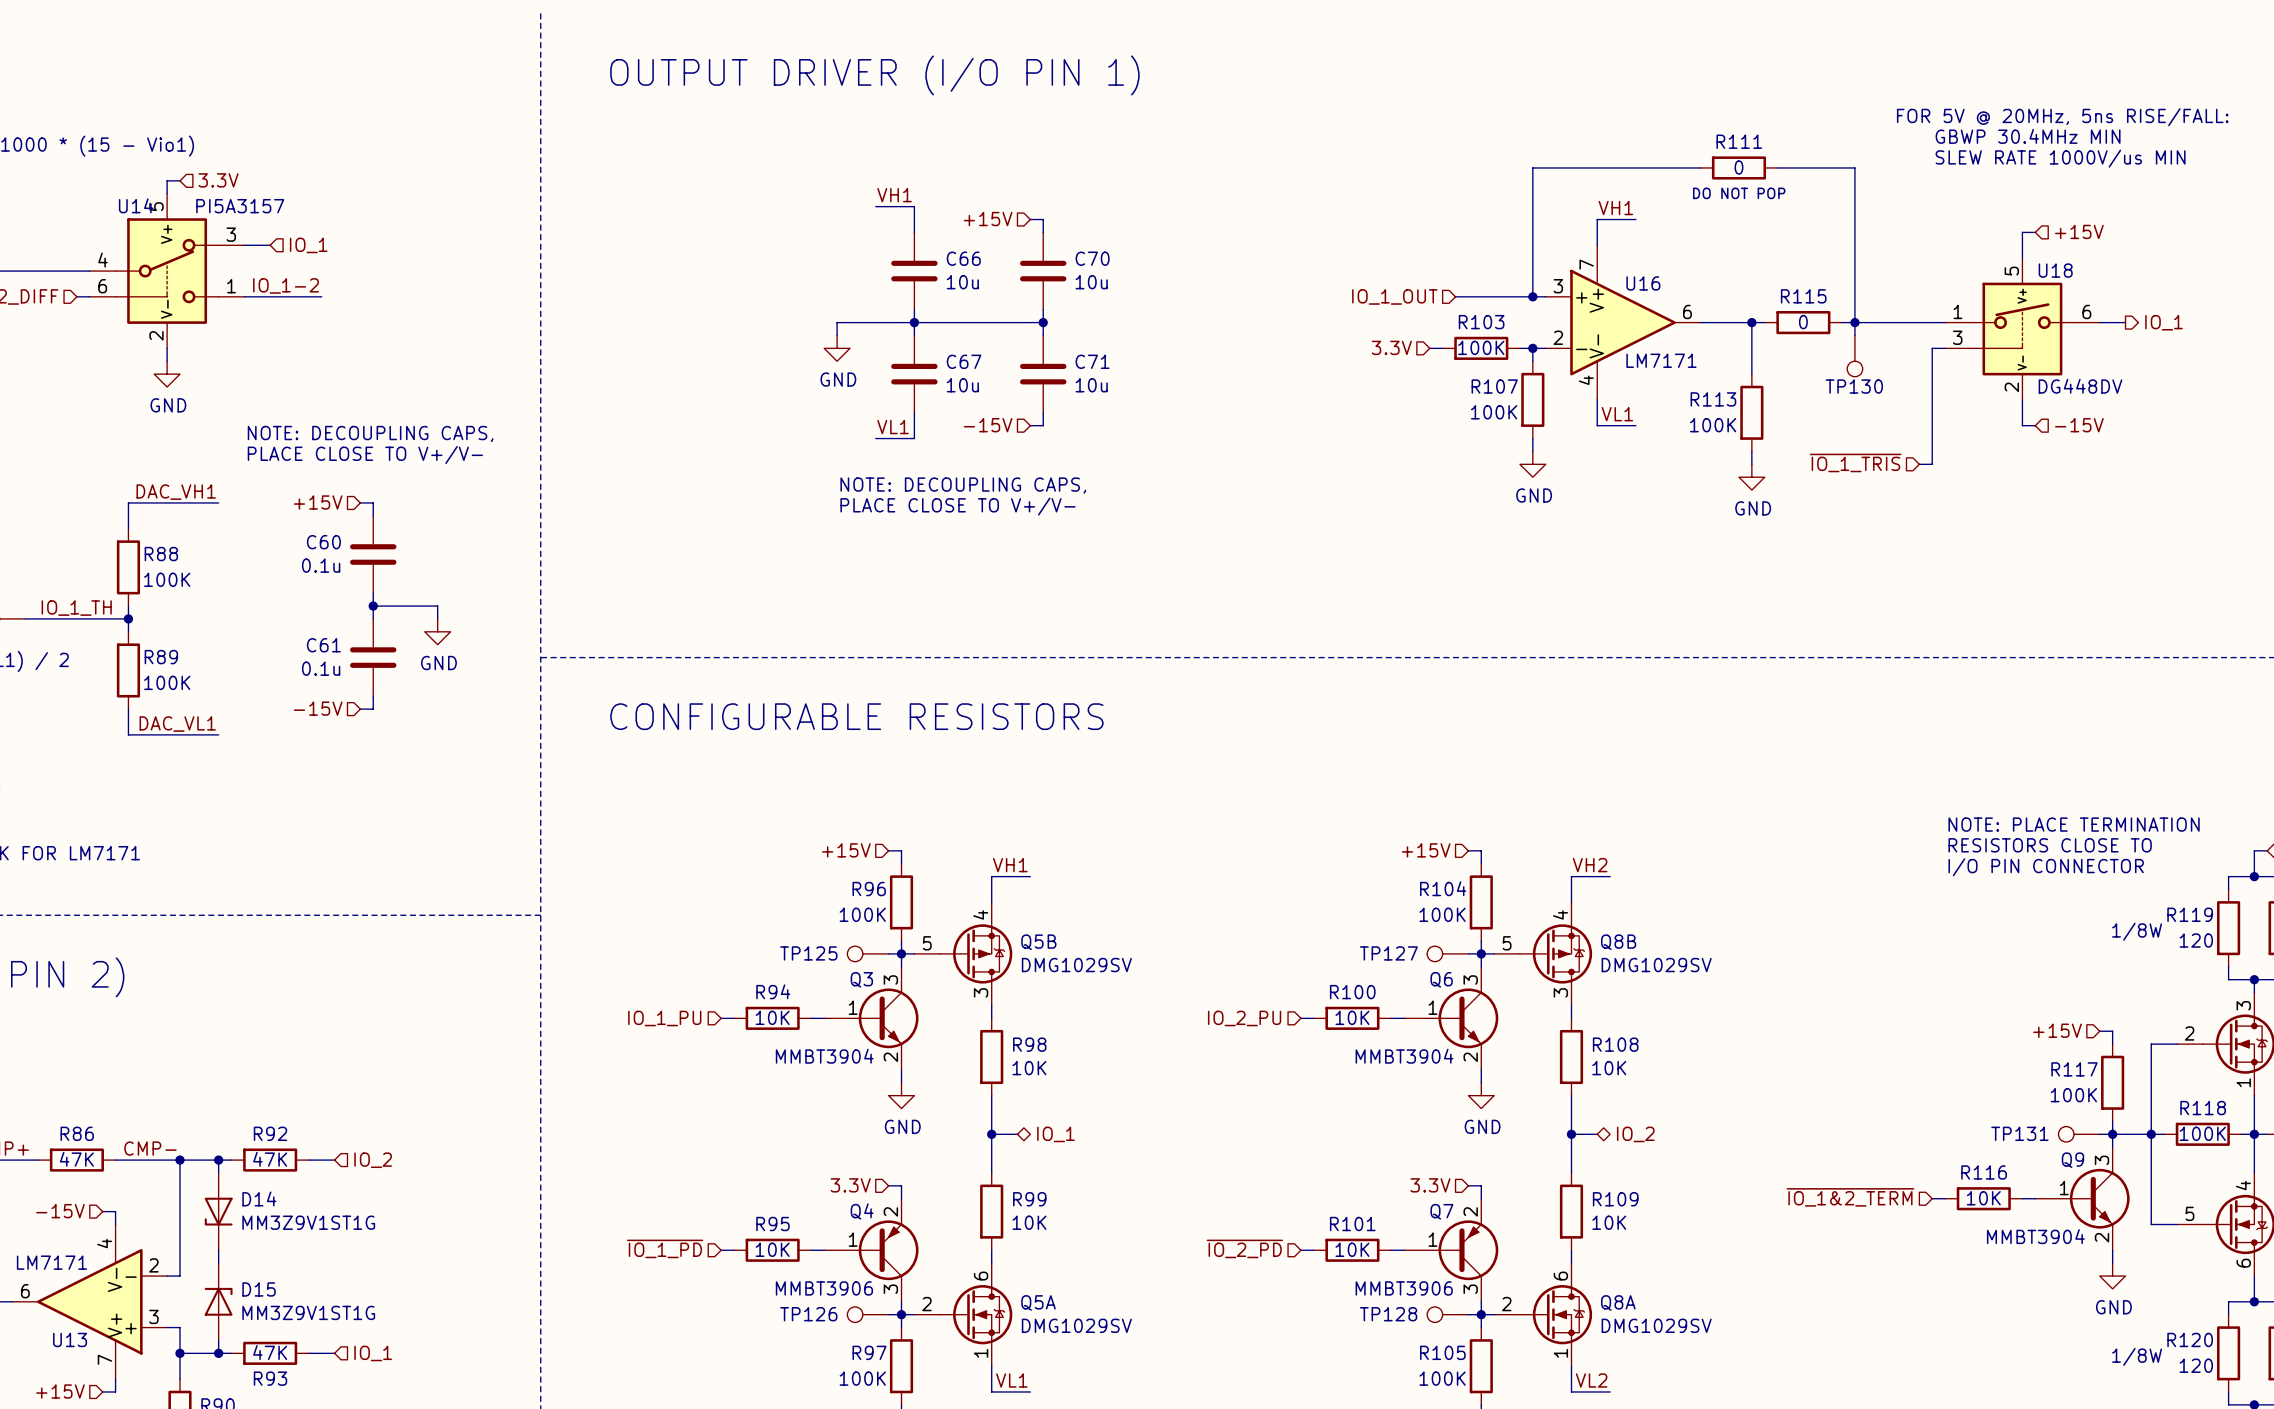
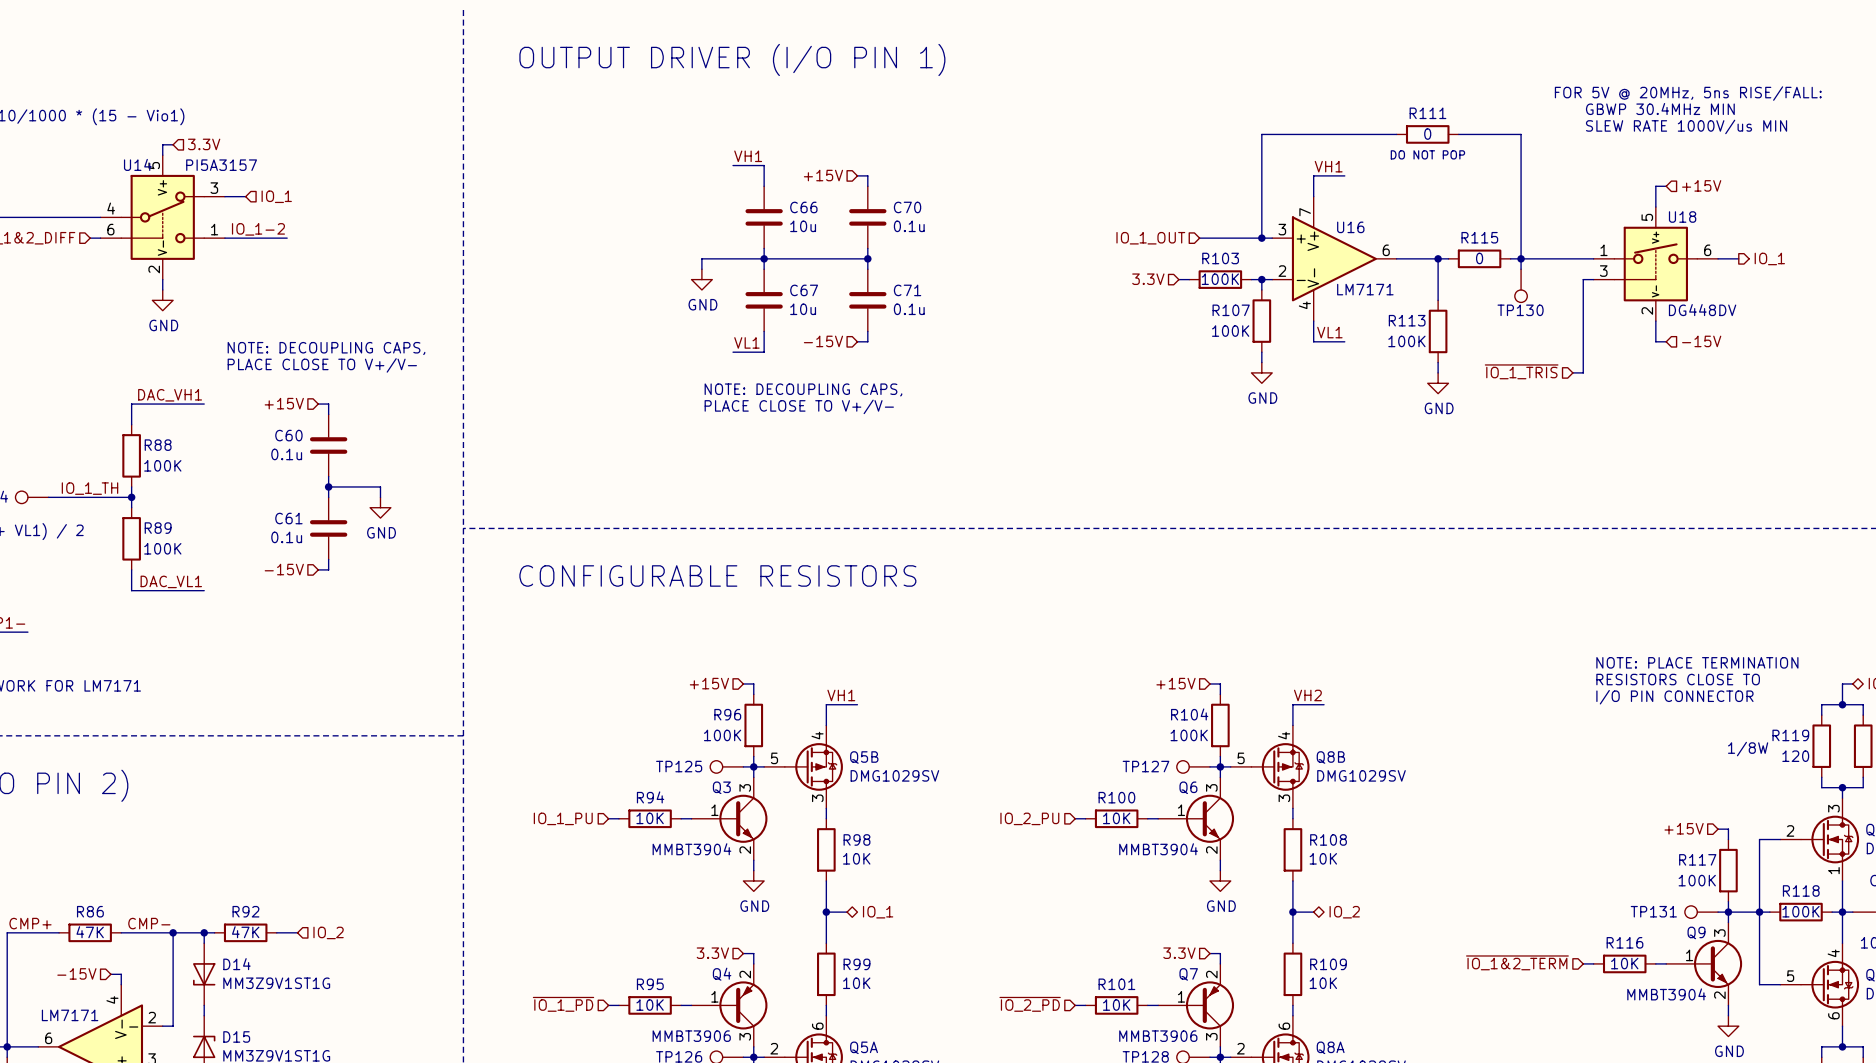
C70 value: 10u (1091, 282) -> 0.1u (909, 226)
C71 value: 10u (1091, 385) -> 0.1u (909, 309)

